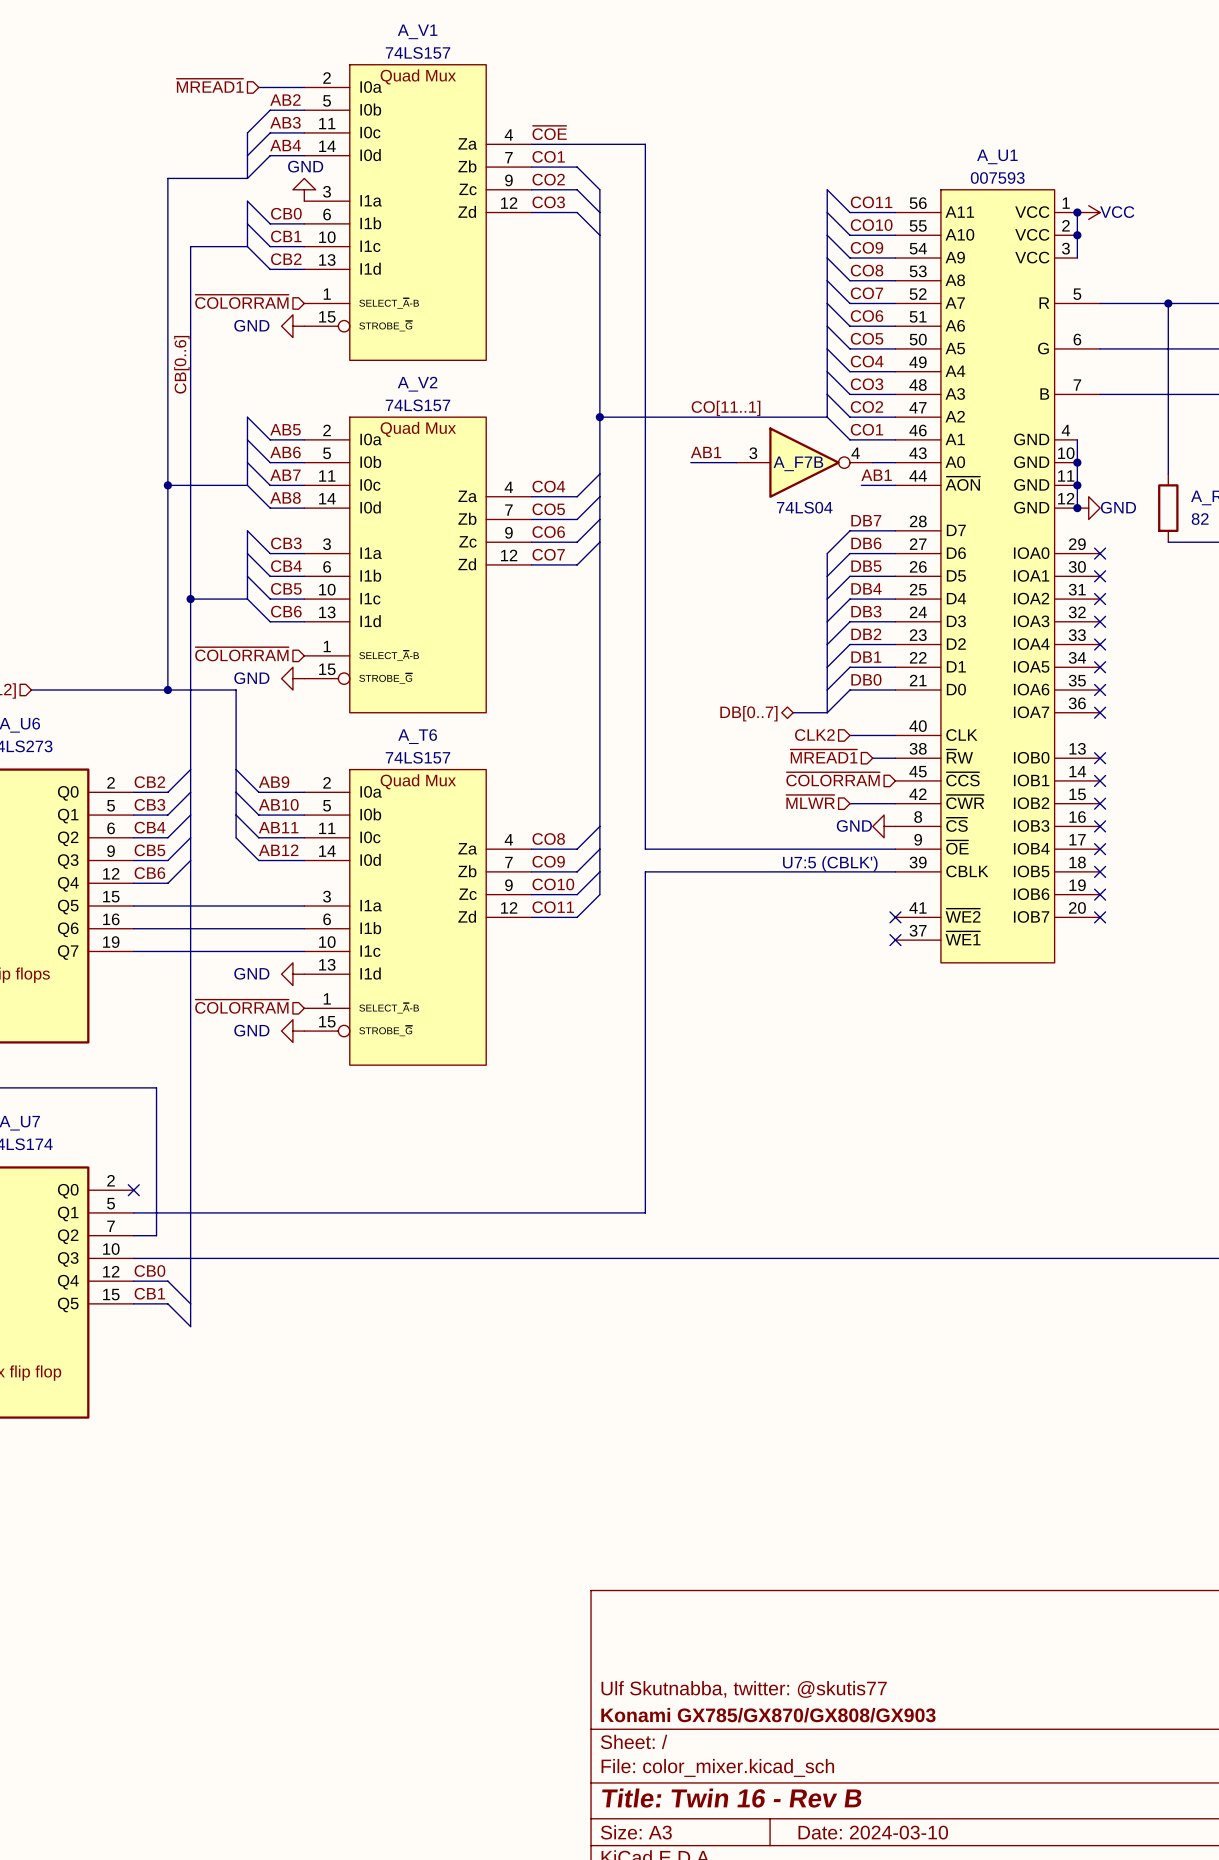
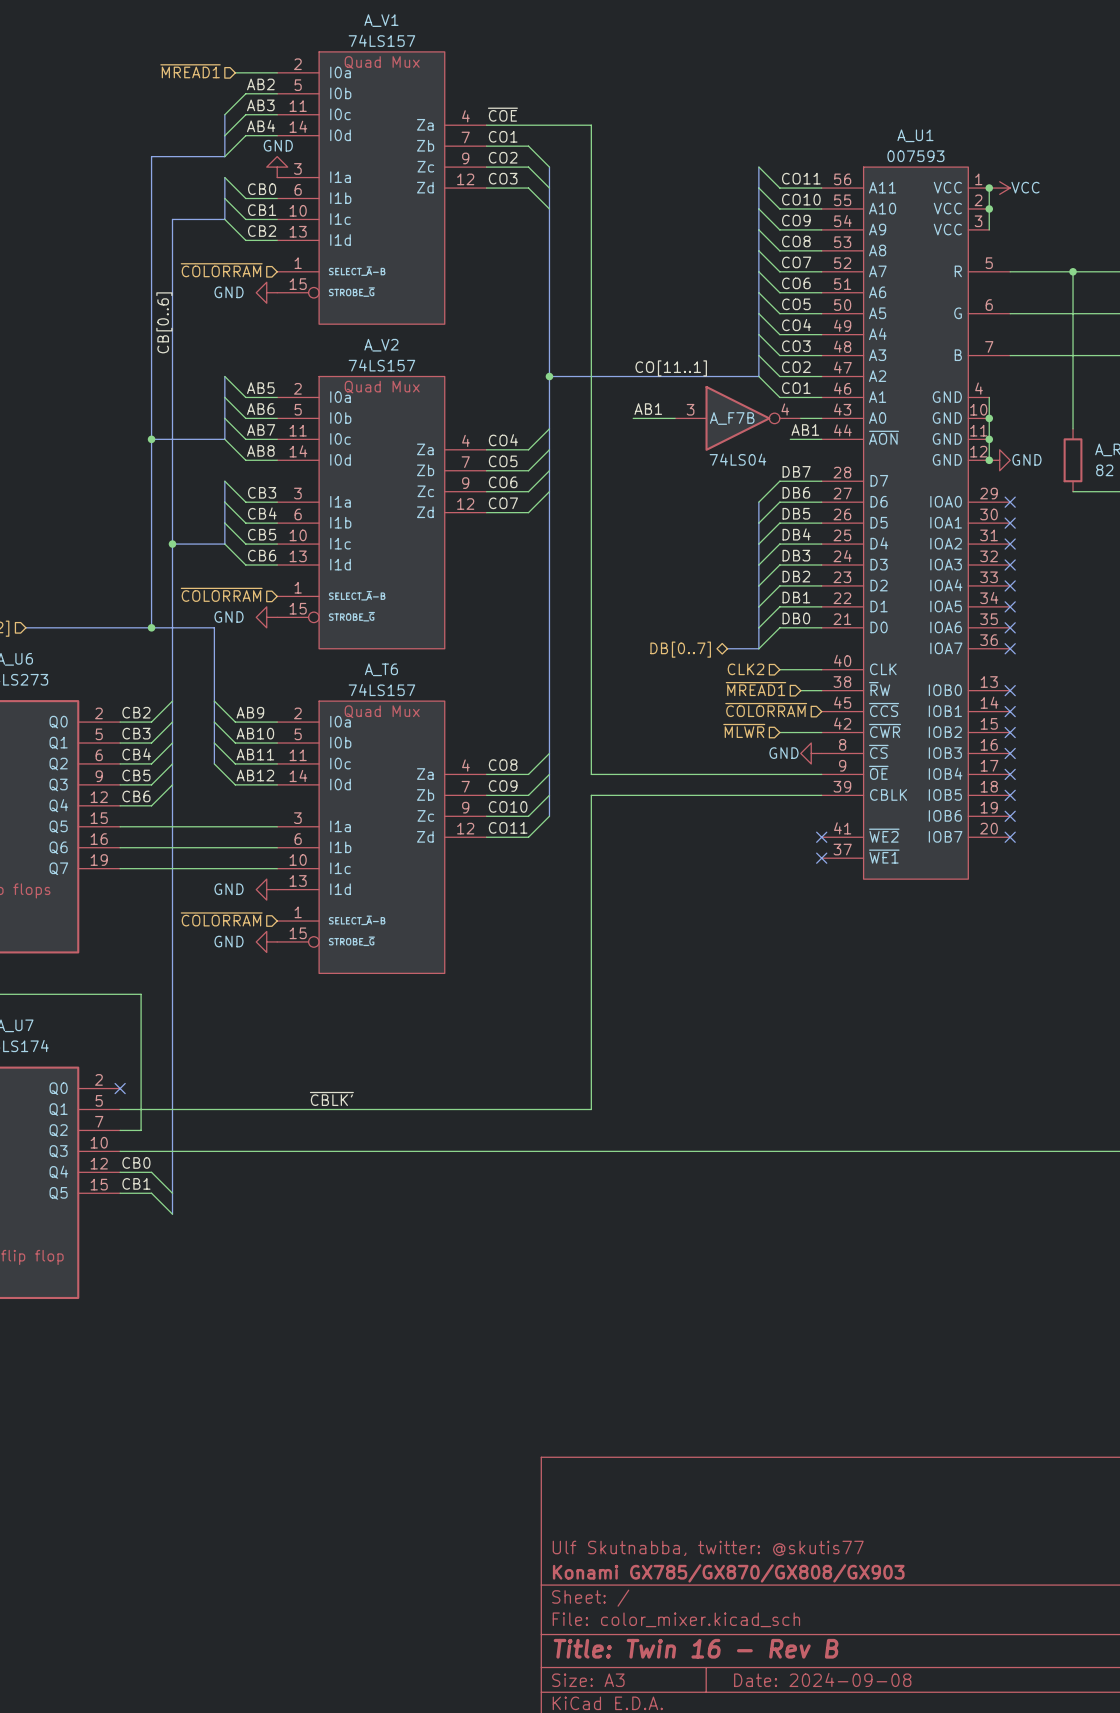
text: U7:5 (CBLK') (830, 863) -> none
label: none -> ~{CBLK'} (331, 1098)
title block: Date: 2024-03-10 (873, 1832) -> Date: 2024-09-08 (822, 1679)

